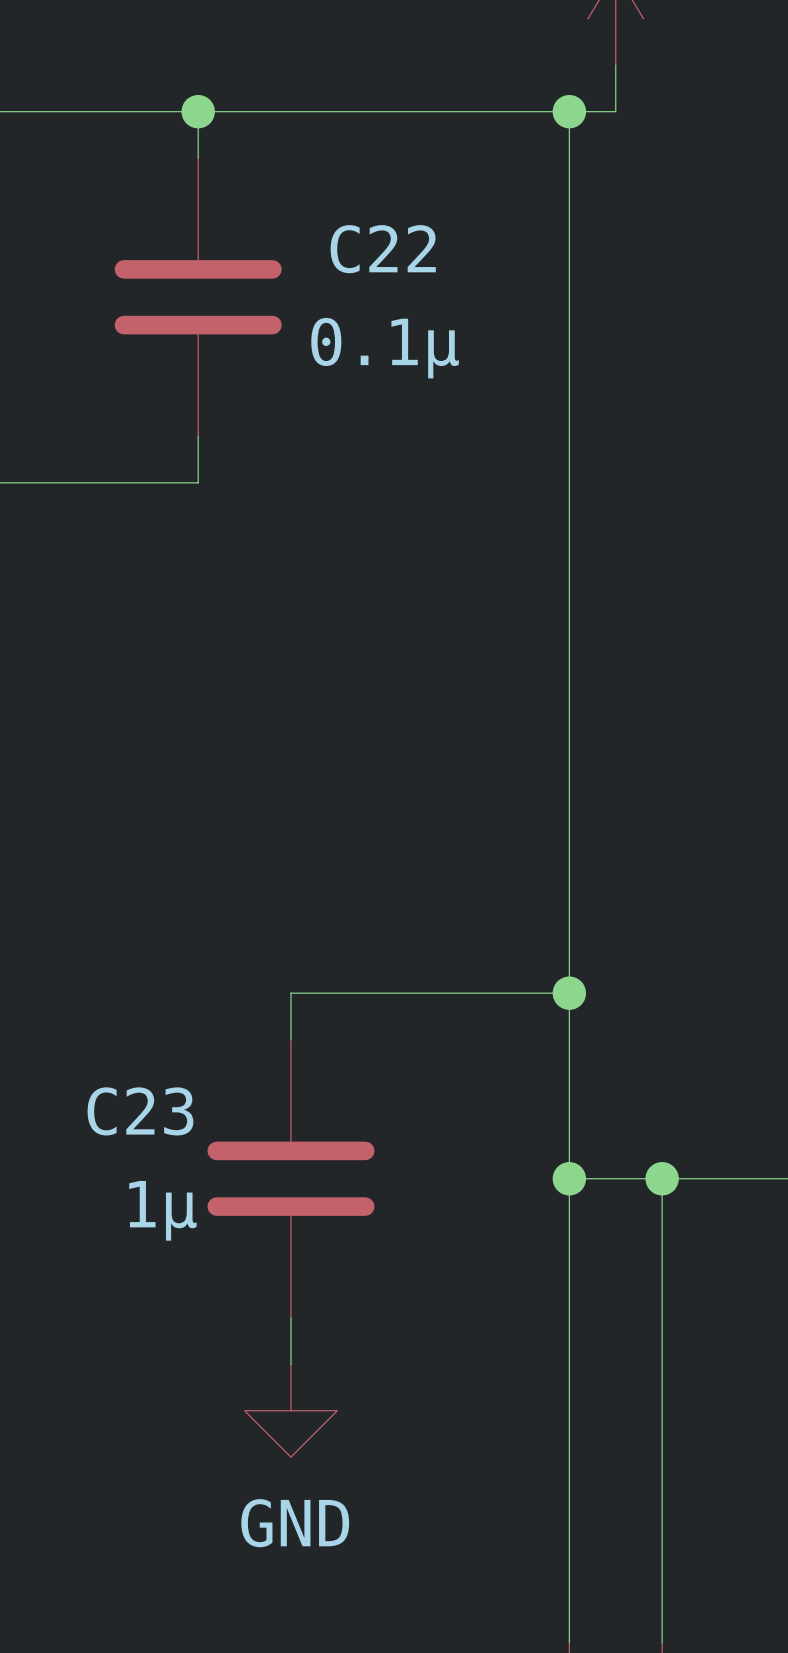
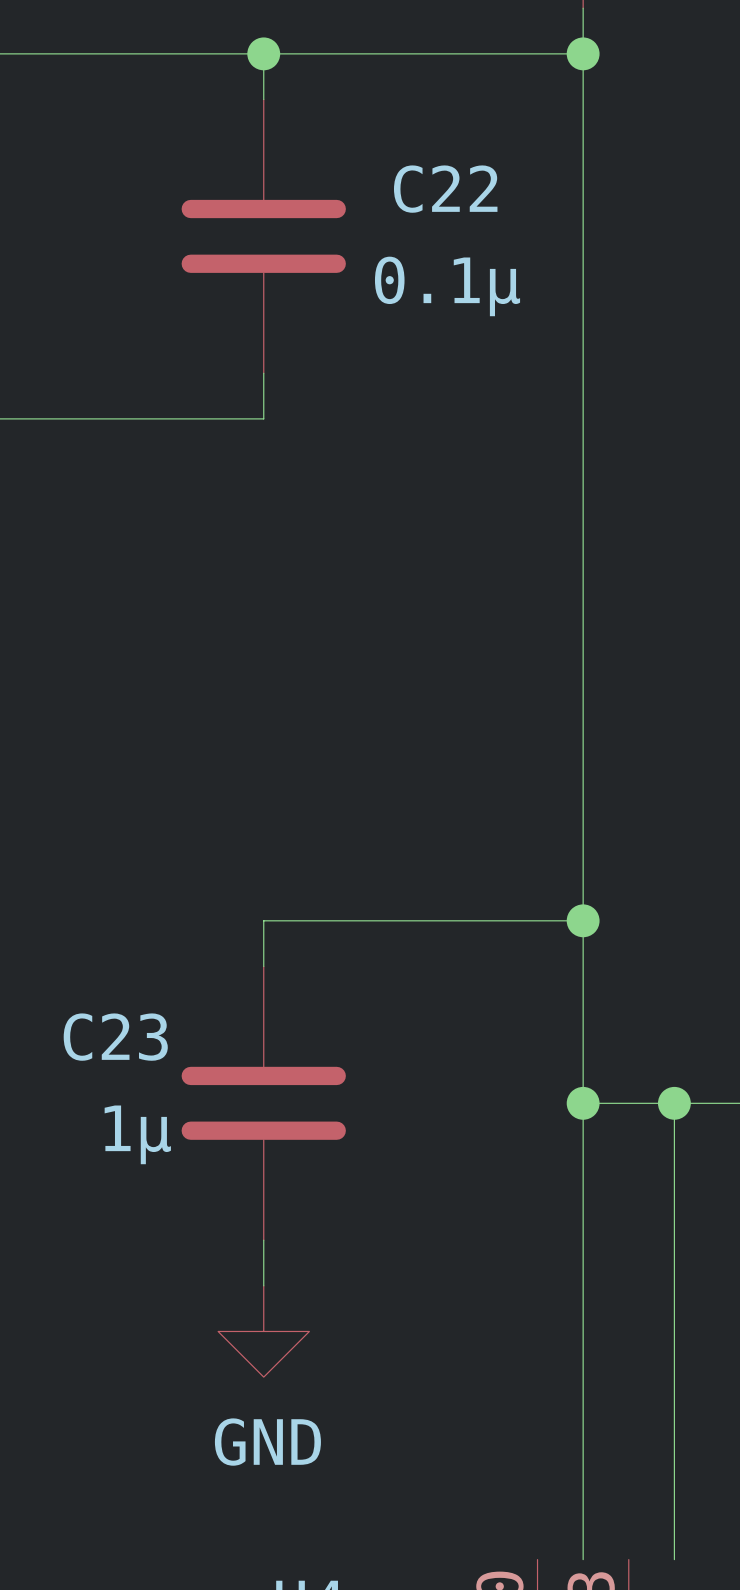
wire: (198, 111) (198, 158) -> (263, 53) (263, 99)
junction position: (198, 111) -> (263, 53)
wire: (569, 111) (569, 1642) -> (583, 53) (583, 1559)
junction position: (569, 111) -> (583, 53)
C22 position: (198, 297) -> (263, 236)
wire: (198, 436) (198, 482) -> (263, 373) (263, 418) (172, 418)
junction position: (569, 993) -> (583, 920)
wire: (569, 1178) (615, 1178) -> (537, 920) (583, 920)
junction: (569, 1178) -> none
junction: none -> (583, 1103)
wire: (662, 1178) (662, 1642) -> (674, 1103) (674, 1559)
junction: (662, 1178) -> none
junction: none -> (674, 1103)

